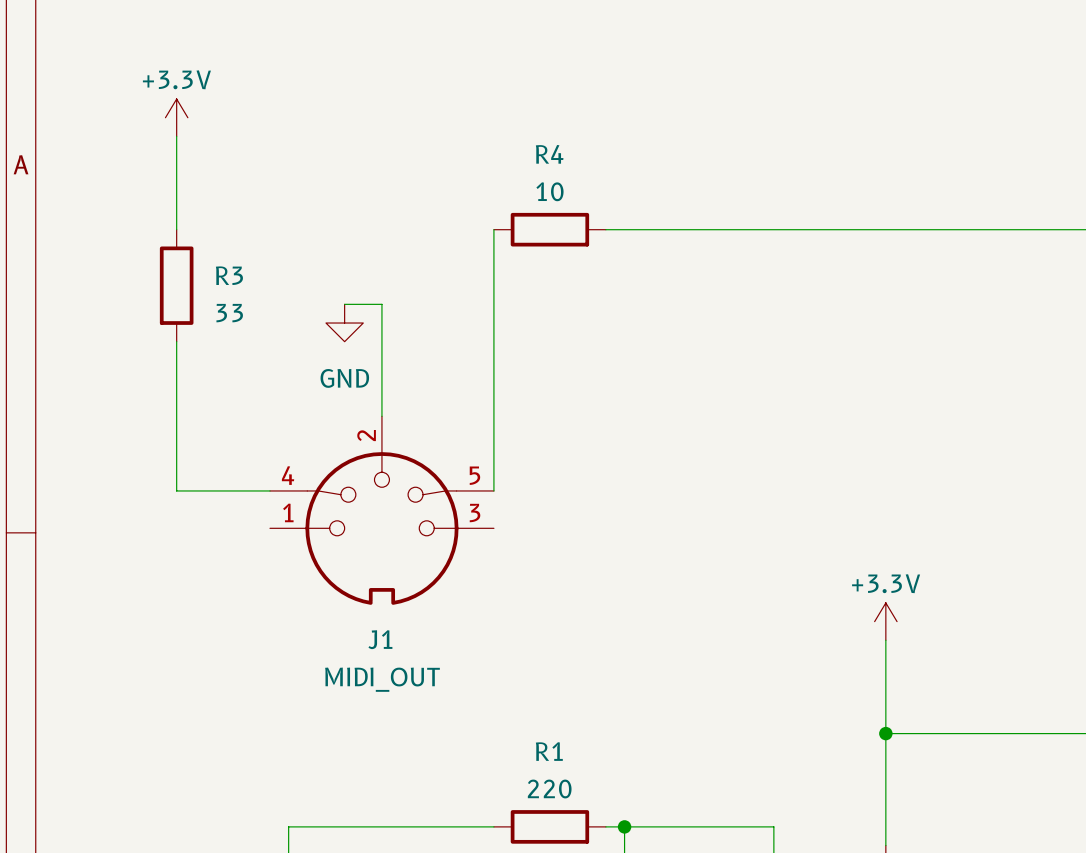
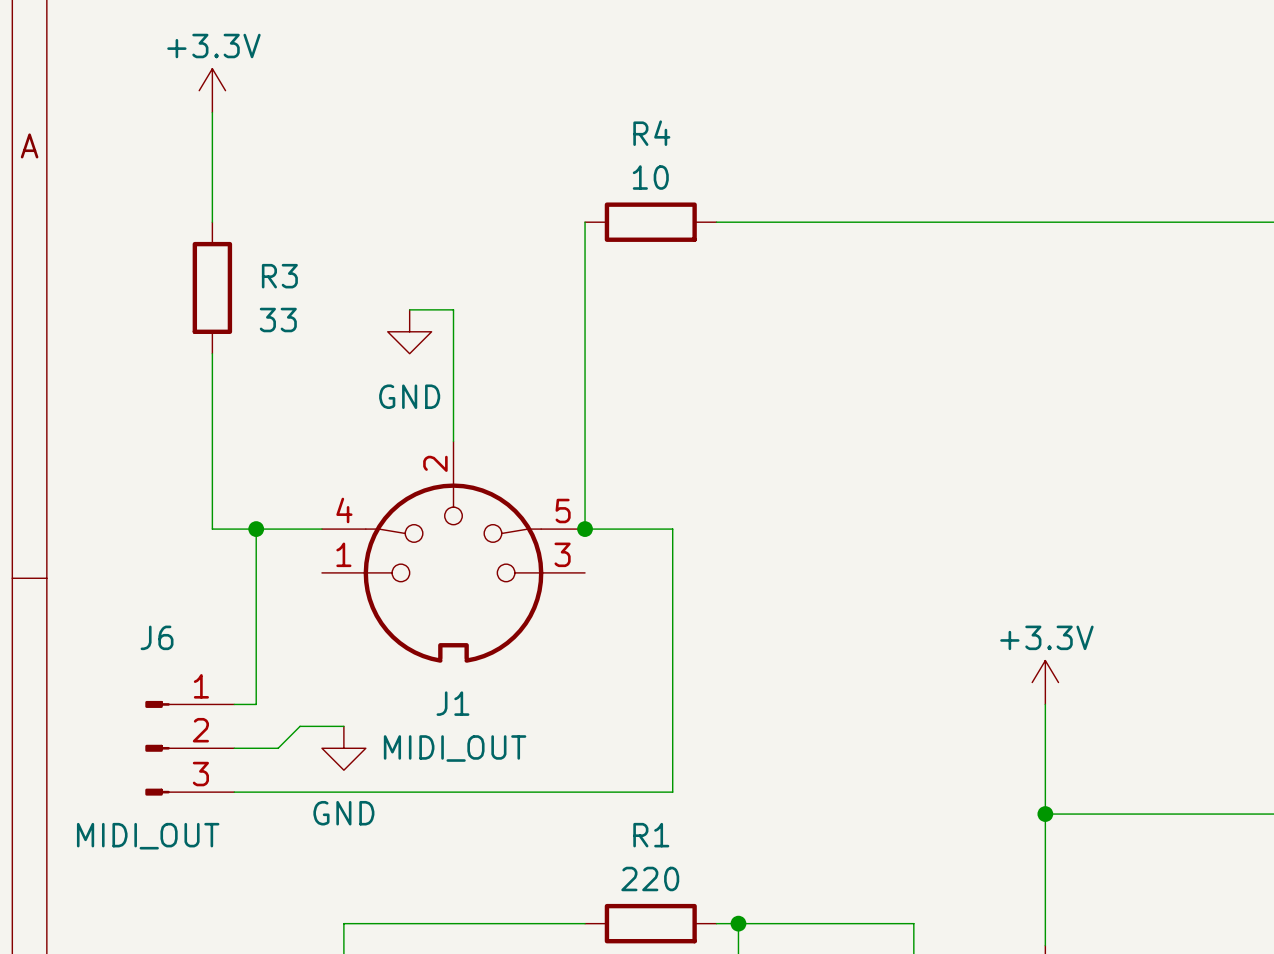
wire: none -> (256, 529) (256, 704) (234, 704)
junction: none -> (256, 529)
wire: none -> (585, 529) (672, 529) (672, 792) (234, 792)
junction: none -> (585, 529)
wire: none -> (343, 726) (300, 726) (278, 748) (234, 748)
J6: none -> MIDI_OUT (189, 748)
power symbol: none -> GND (343, 748)

